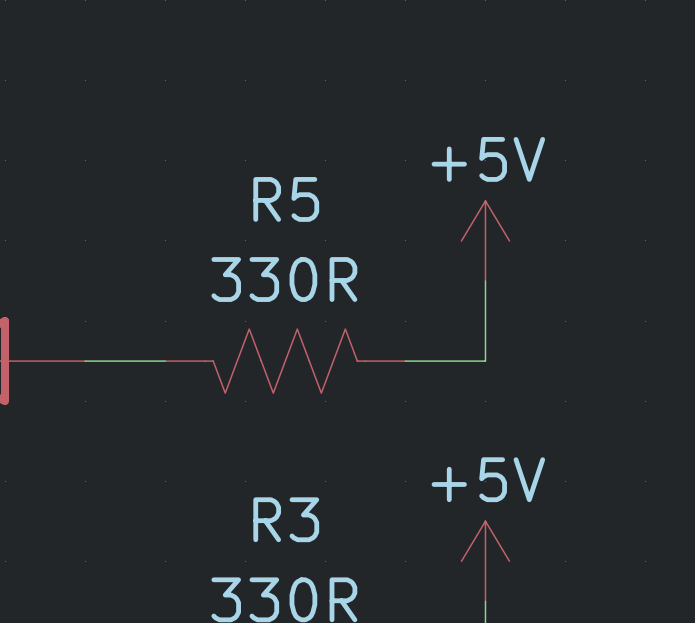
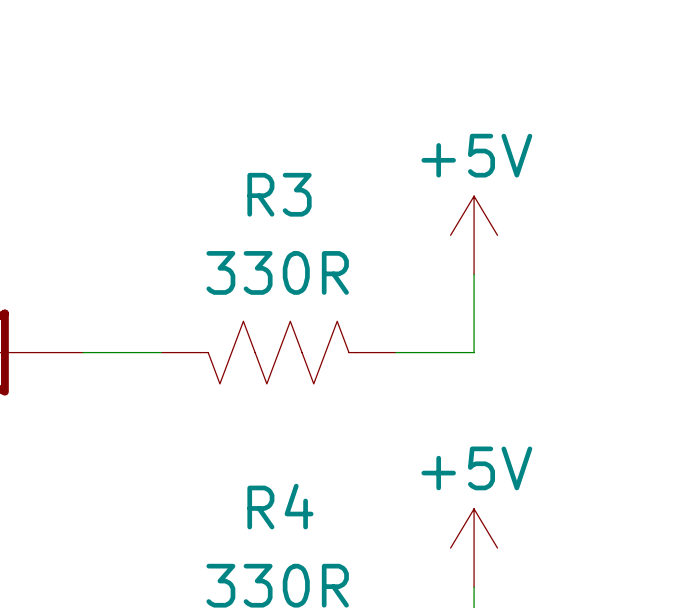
R5 name: R5 (286, 199) -> R3 (279, 194)
R3 name: R3 (286, 519) -> R4 (280, 506)

